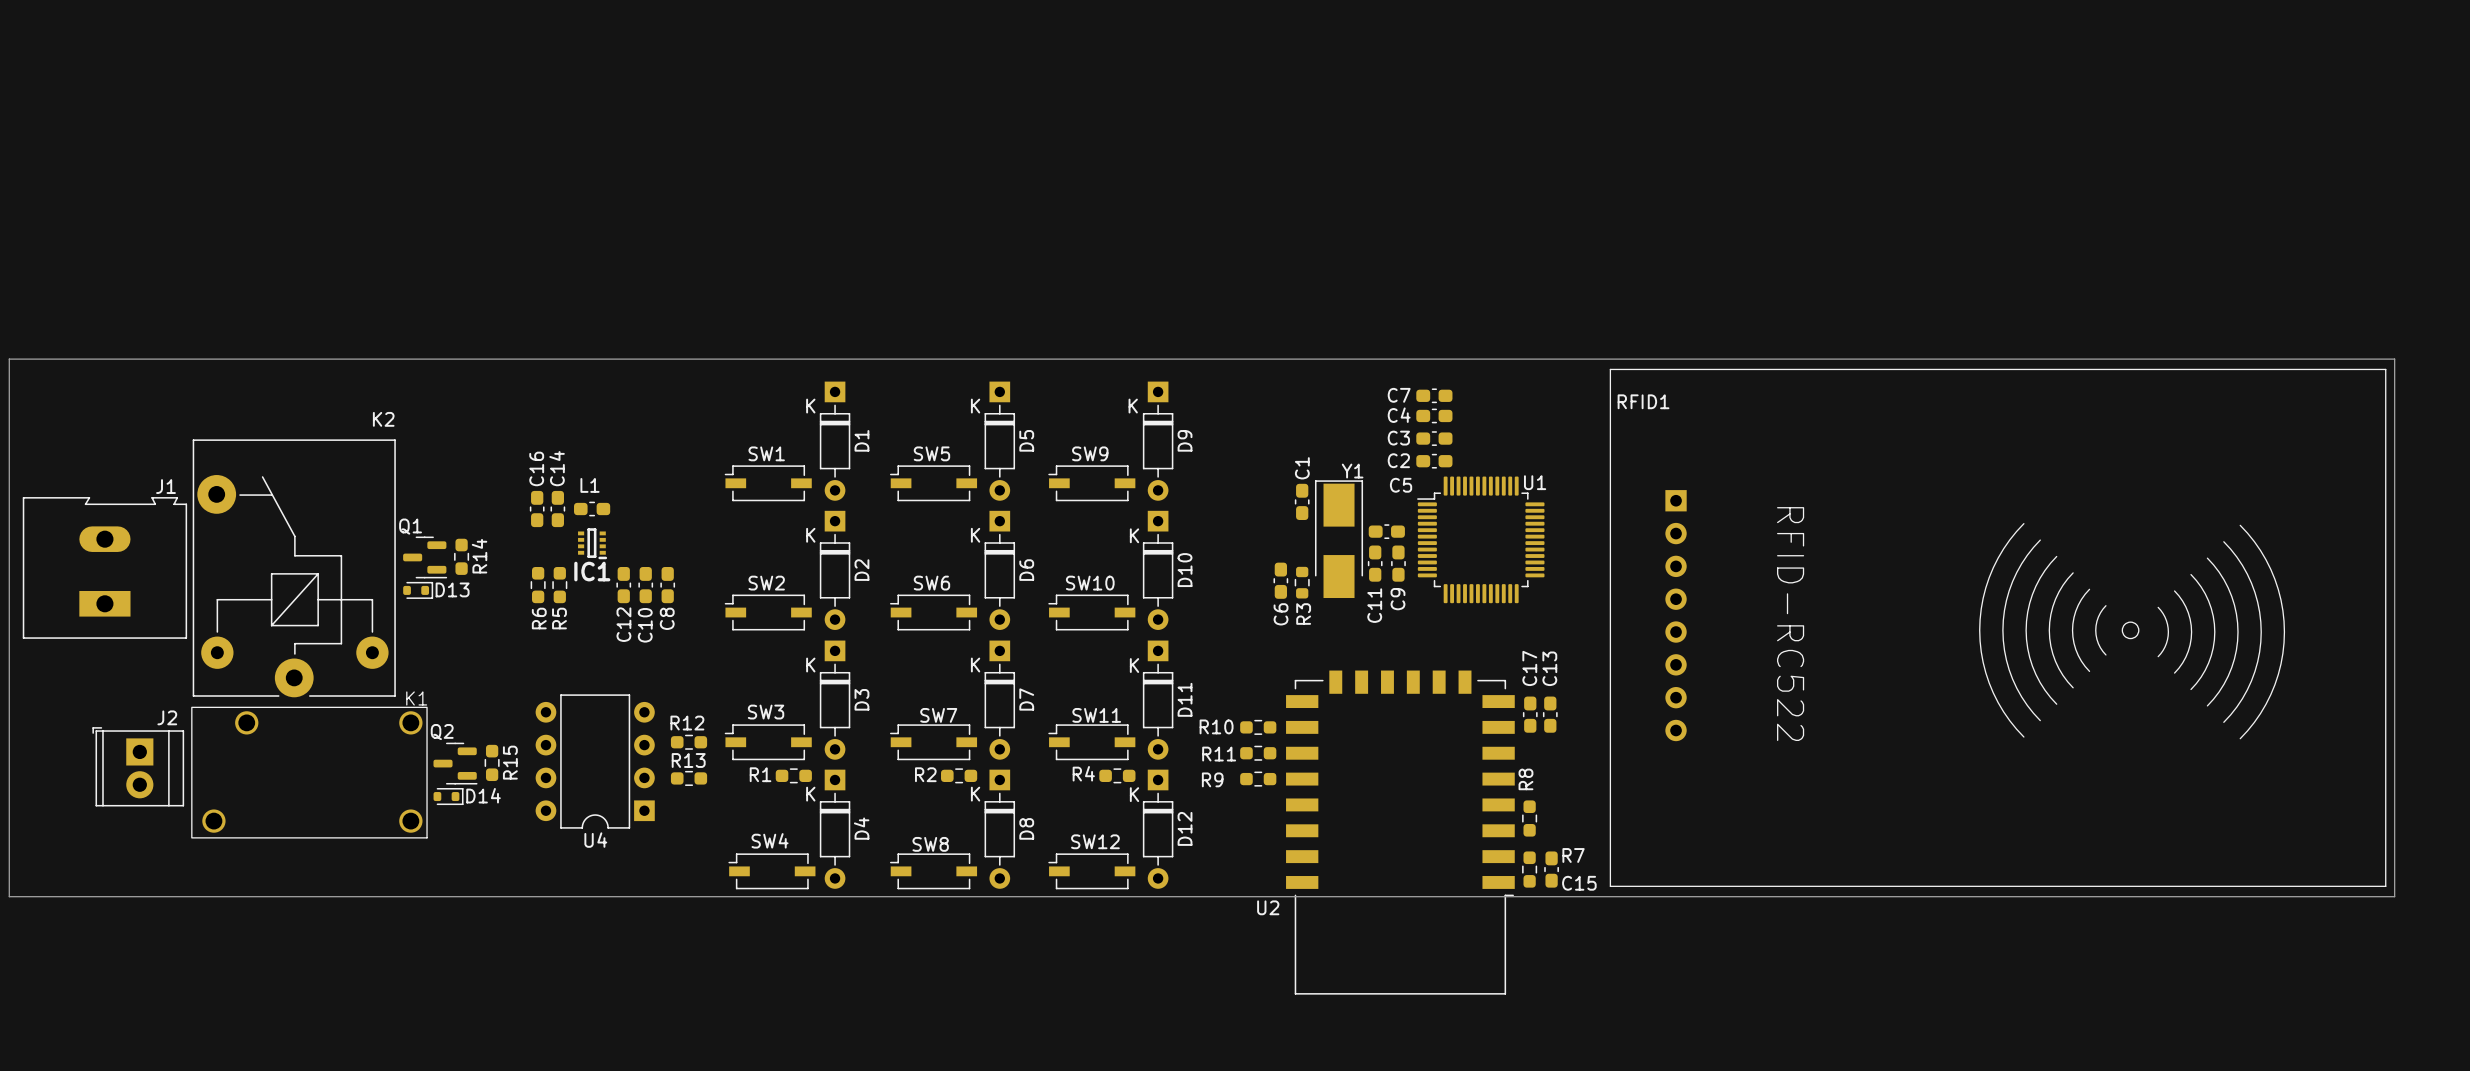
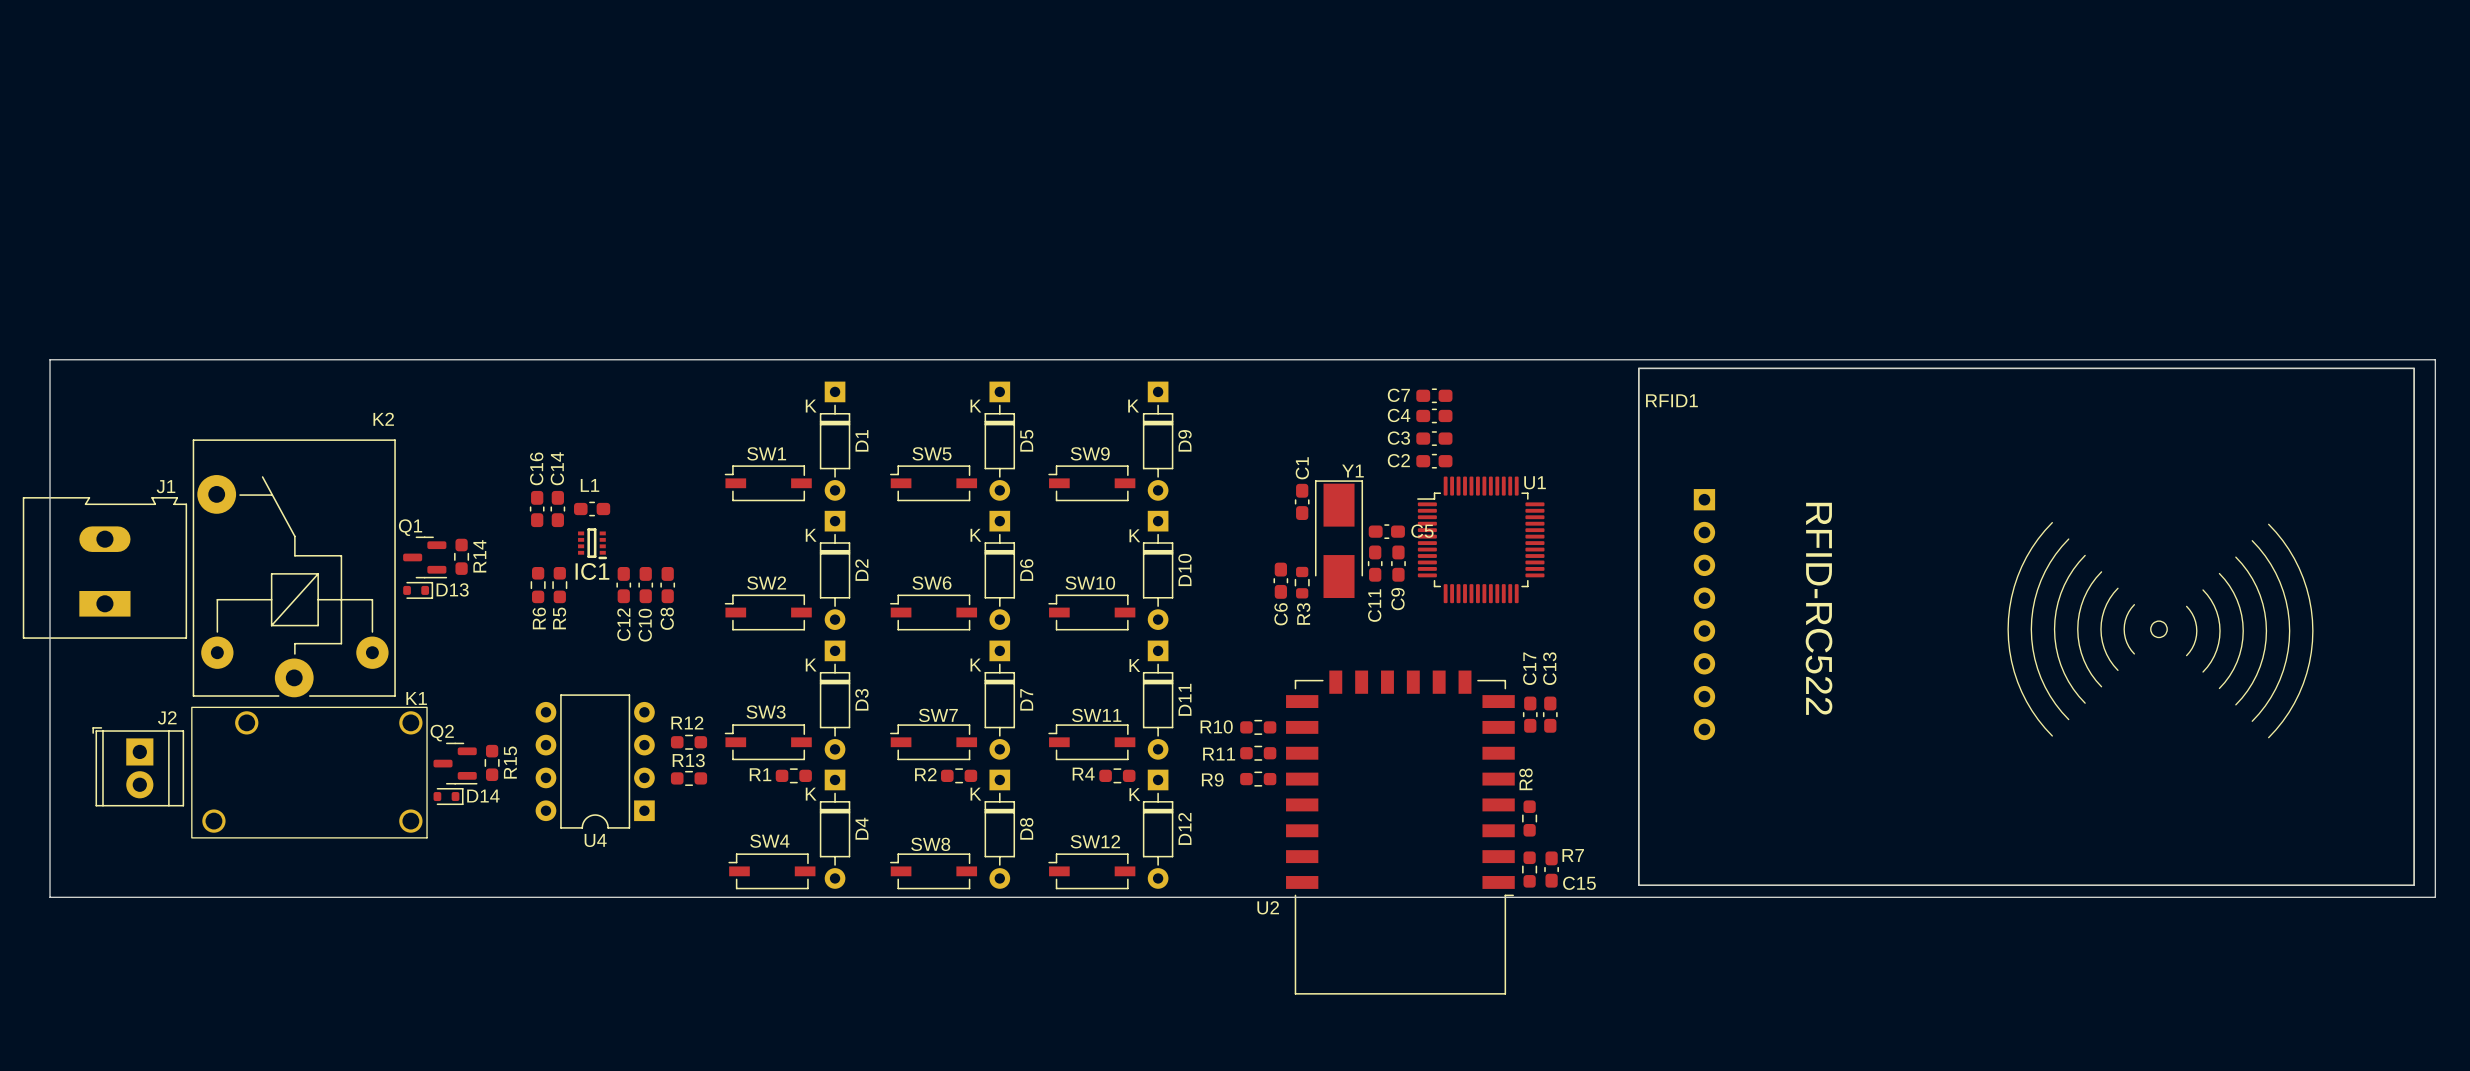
board edge: (9, 359) (2394, 359) (2394, 896) (9, 896) (9, 359) -> (50, 359) (50, 897) (2435, 897) (2435, 359) (50, 359)
RFID1 footprint: [1609, 368, 2387, 887] -> [1638, 367, 2415, 886]
C5 name position: C5 (1401, 485) -> C5 (1422, 531)

